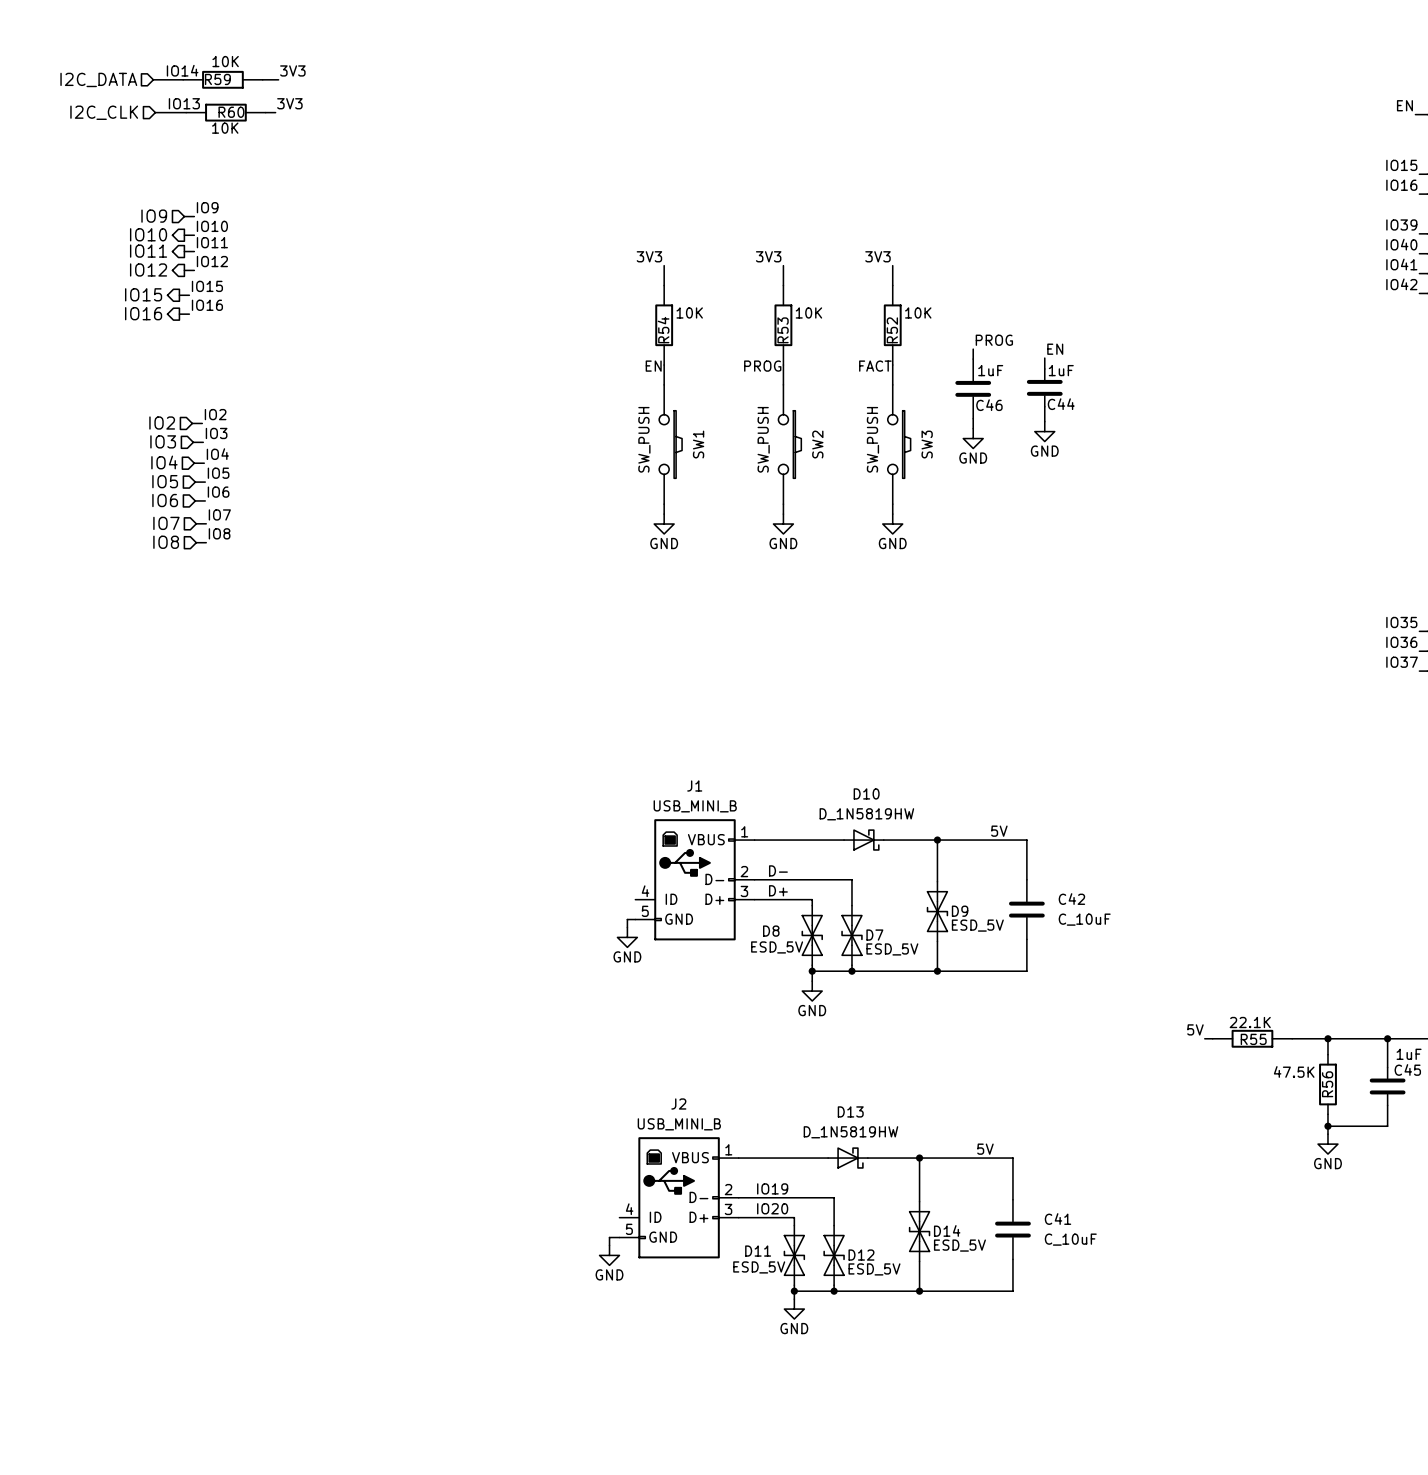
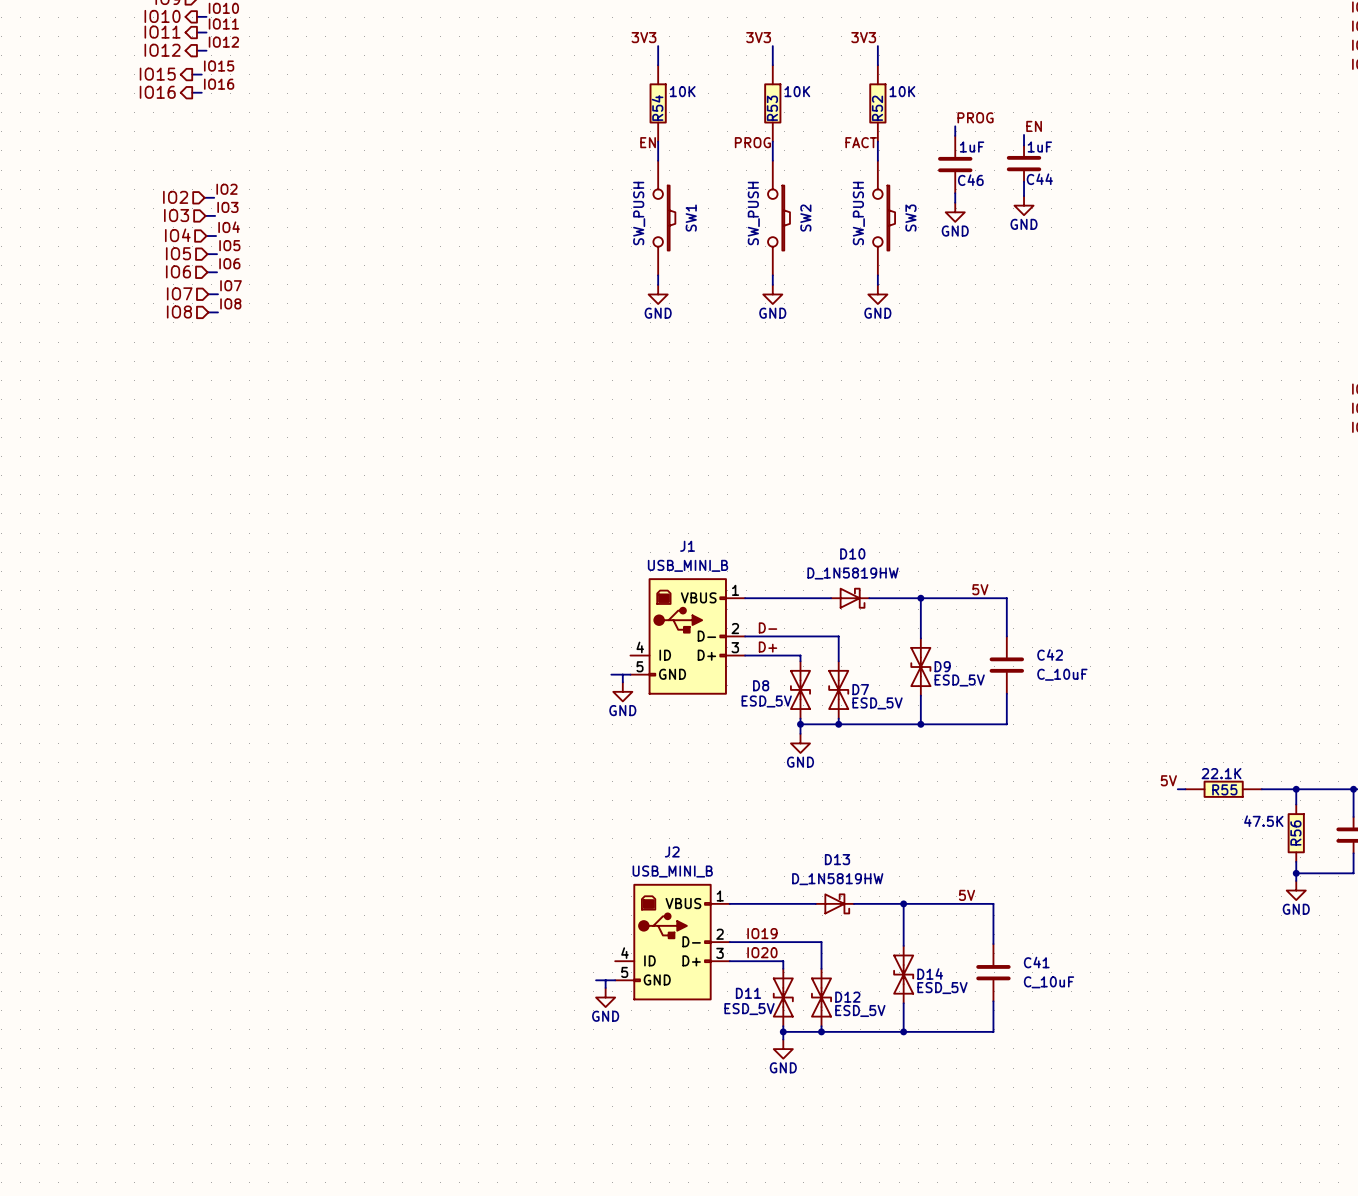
wire: none -> (611, 674) (622, 674)
wire: none -> (596, 980) (605, 980)

